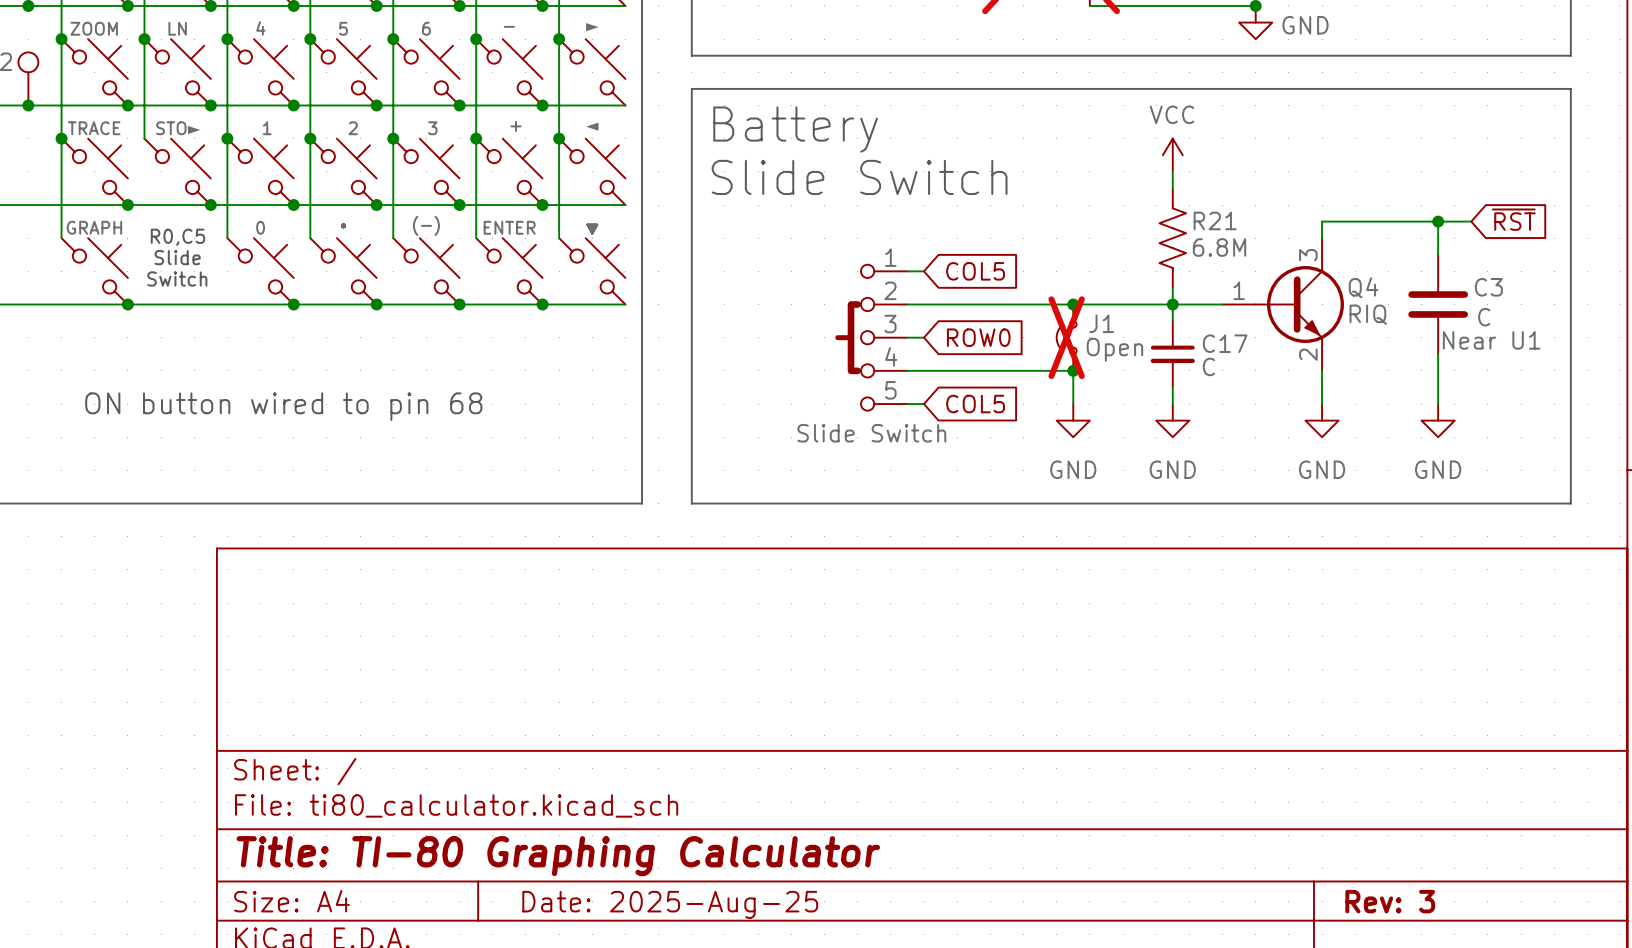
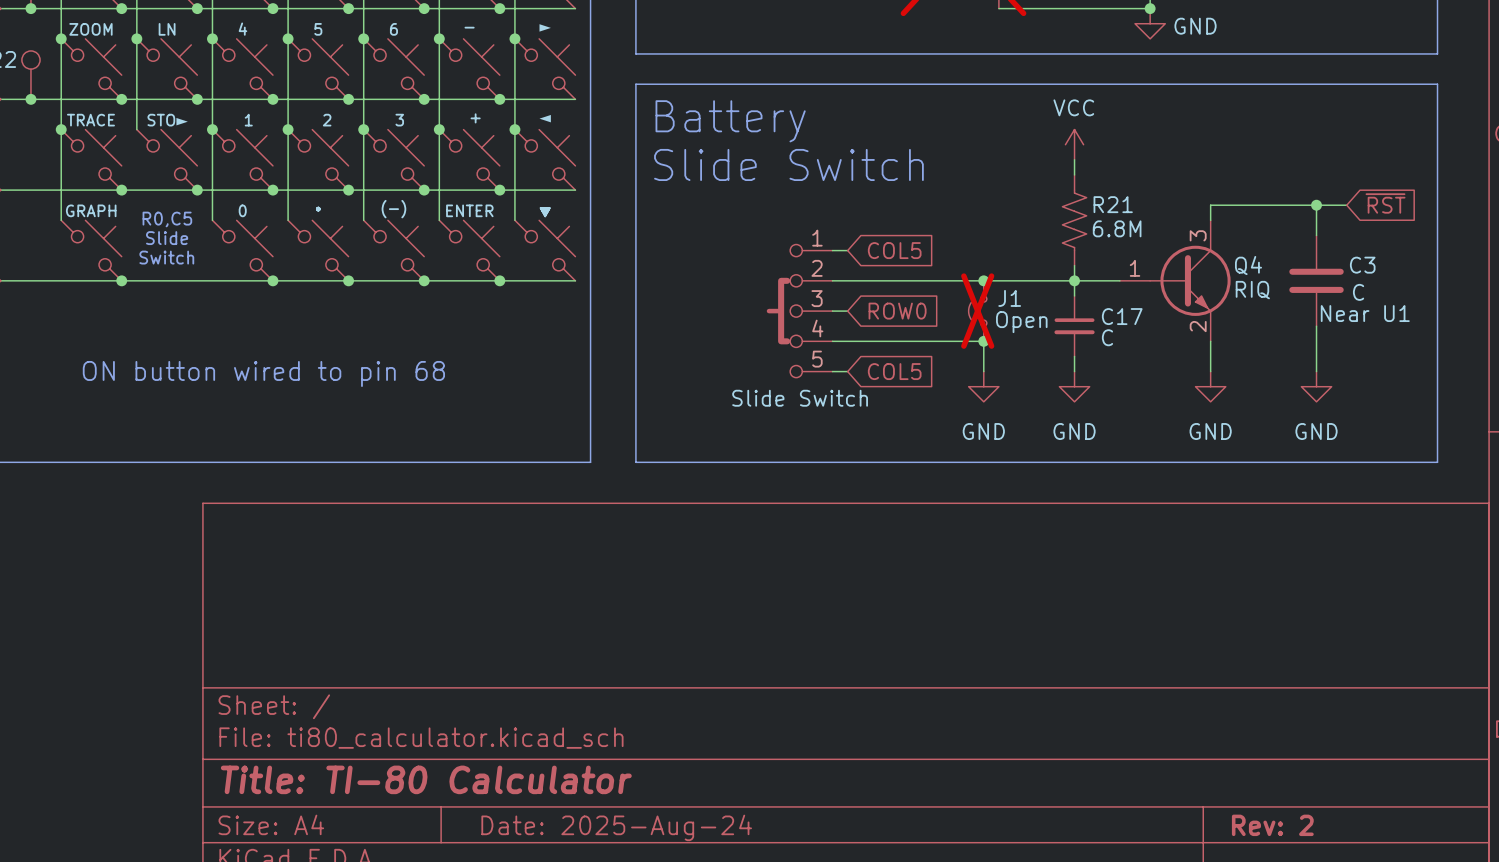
title block: Title: TI-80 Graphing Calculator (558, 856) -> Title: TI-80 Calculator (426, 779)
title block: Rev: 3 (1390, 901) -> Rev: 2 (1272, 825)
title block: Date: 2025-Aug-25 (670, 904) -> Date: 2025-Aug-24 (616, 827)

